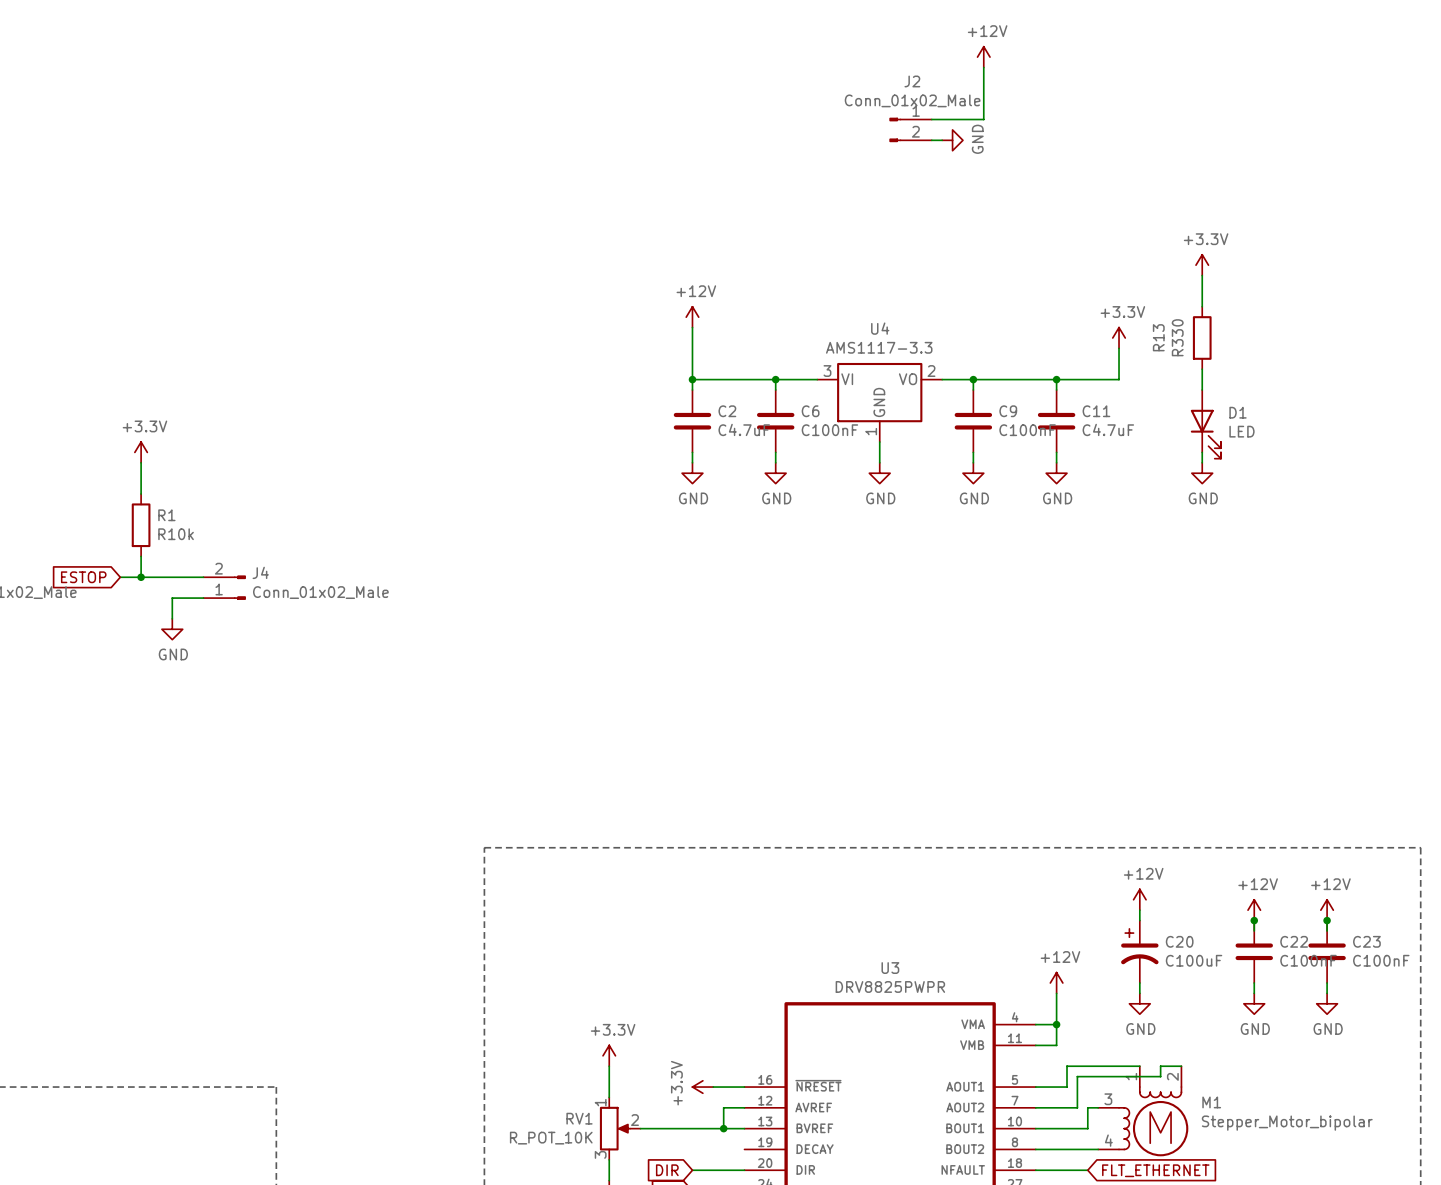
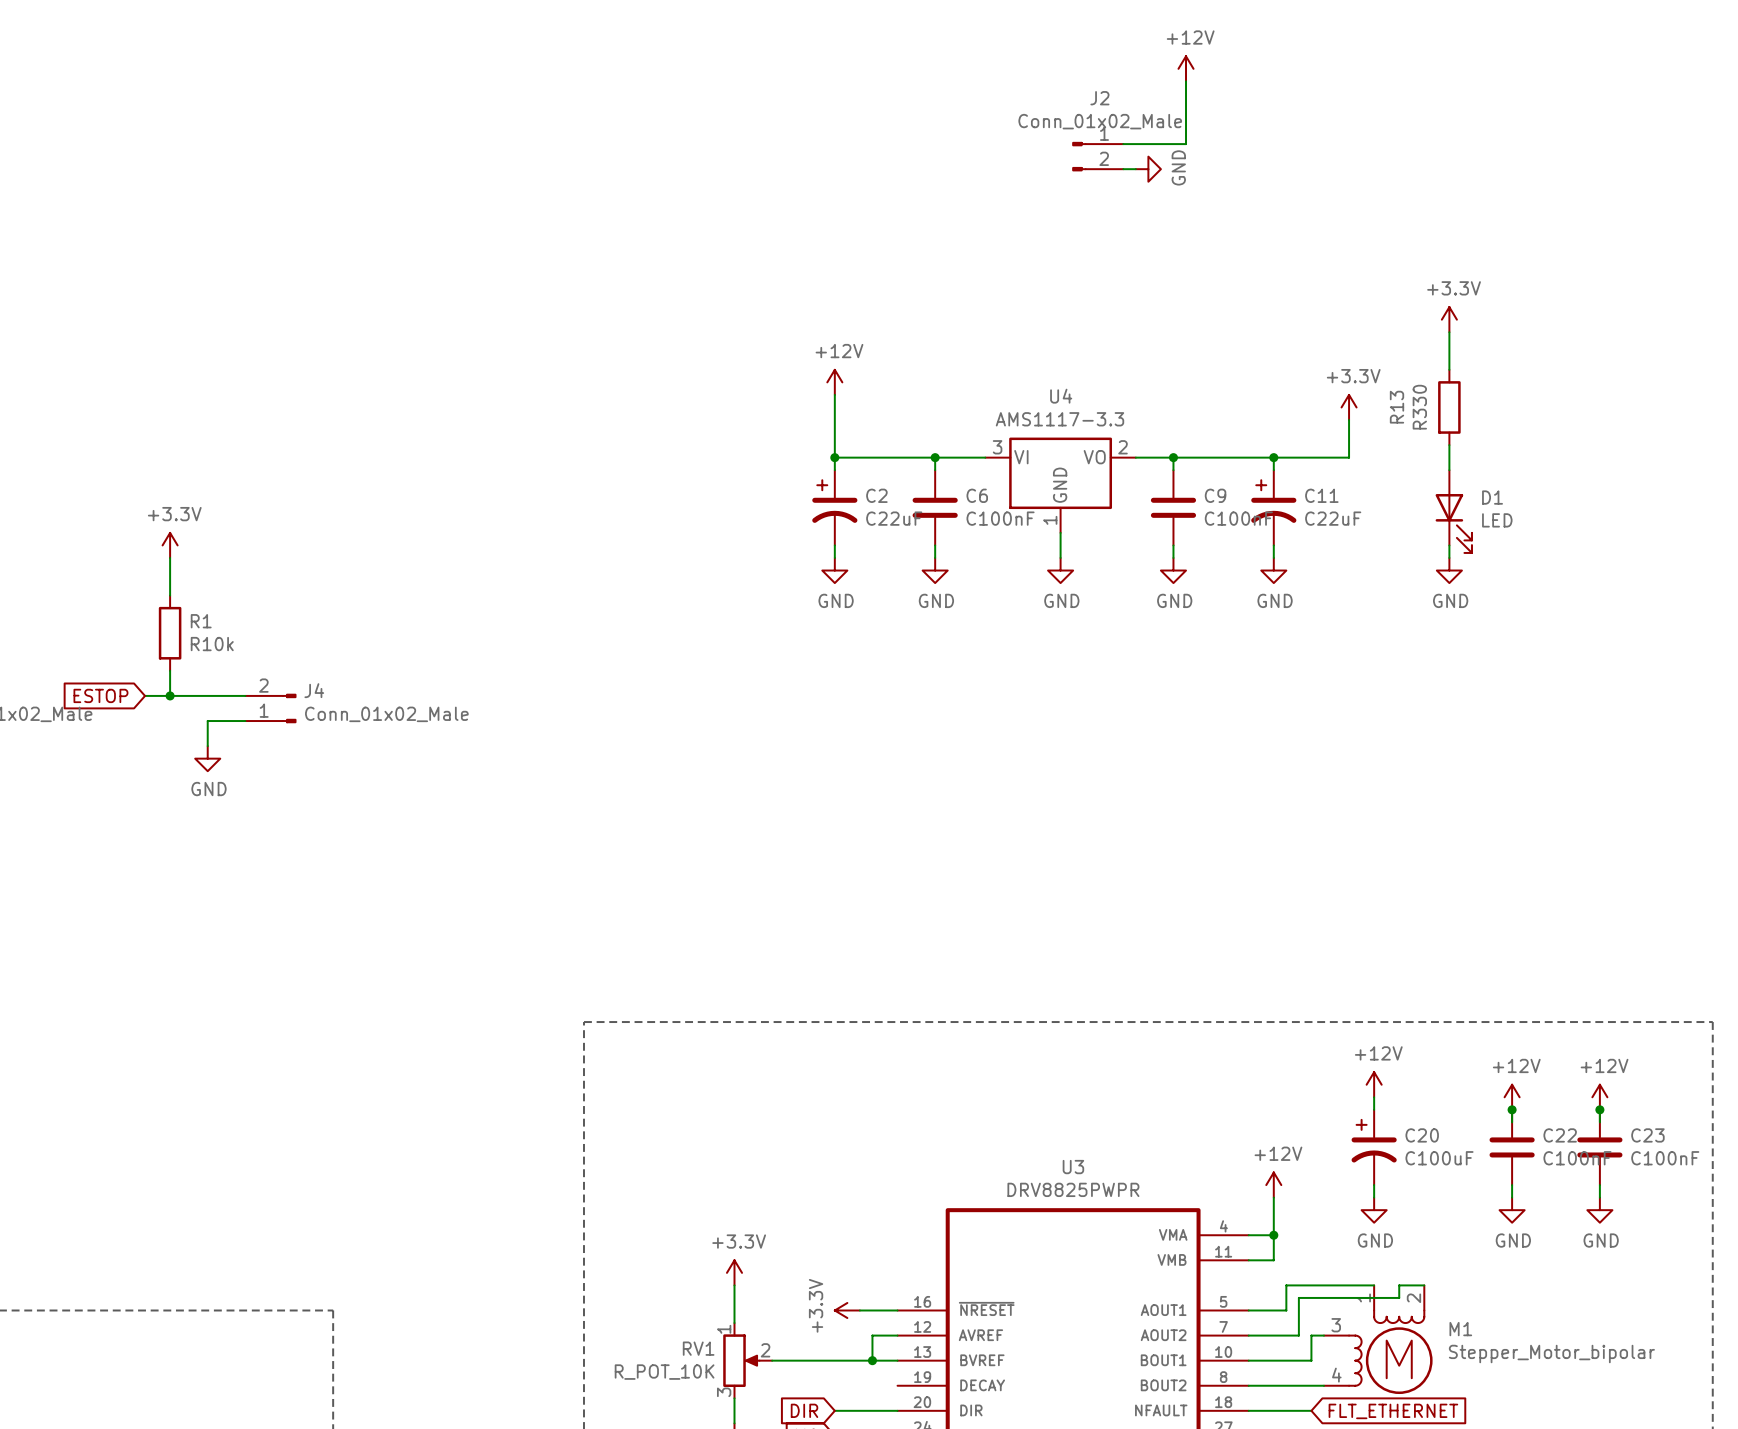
C2 symbol: [673, 390, 712, 453] -> [812, 470, 858, 546]
C11 symbol: [1037, 390, 1076, 453] -> [1251, 470, 1297, 546]
C2 value: C4.7uF (744, 429) -> C22uF (894, 518)
C11 value: C4.7uF (1108, 429) -> C22uF (1333, 518)

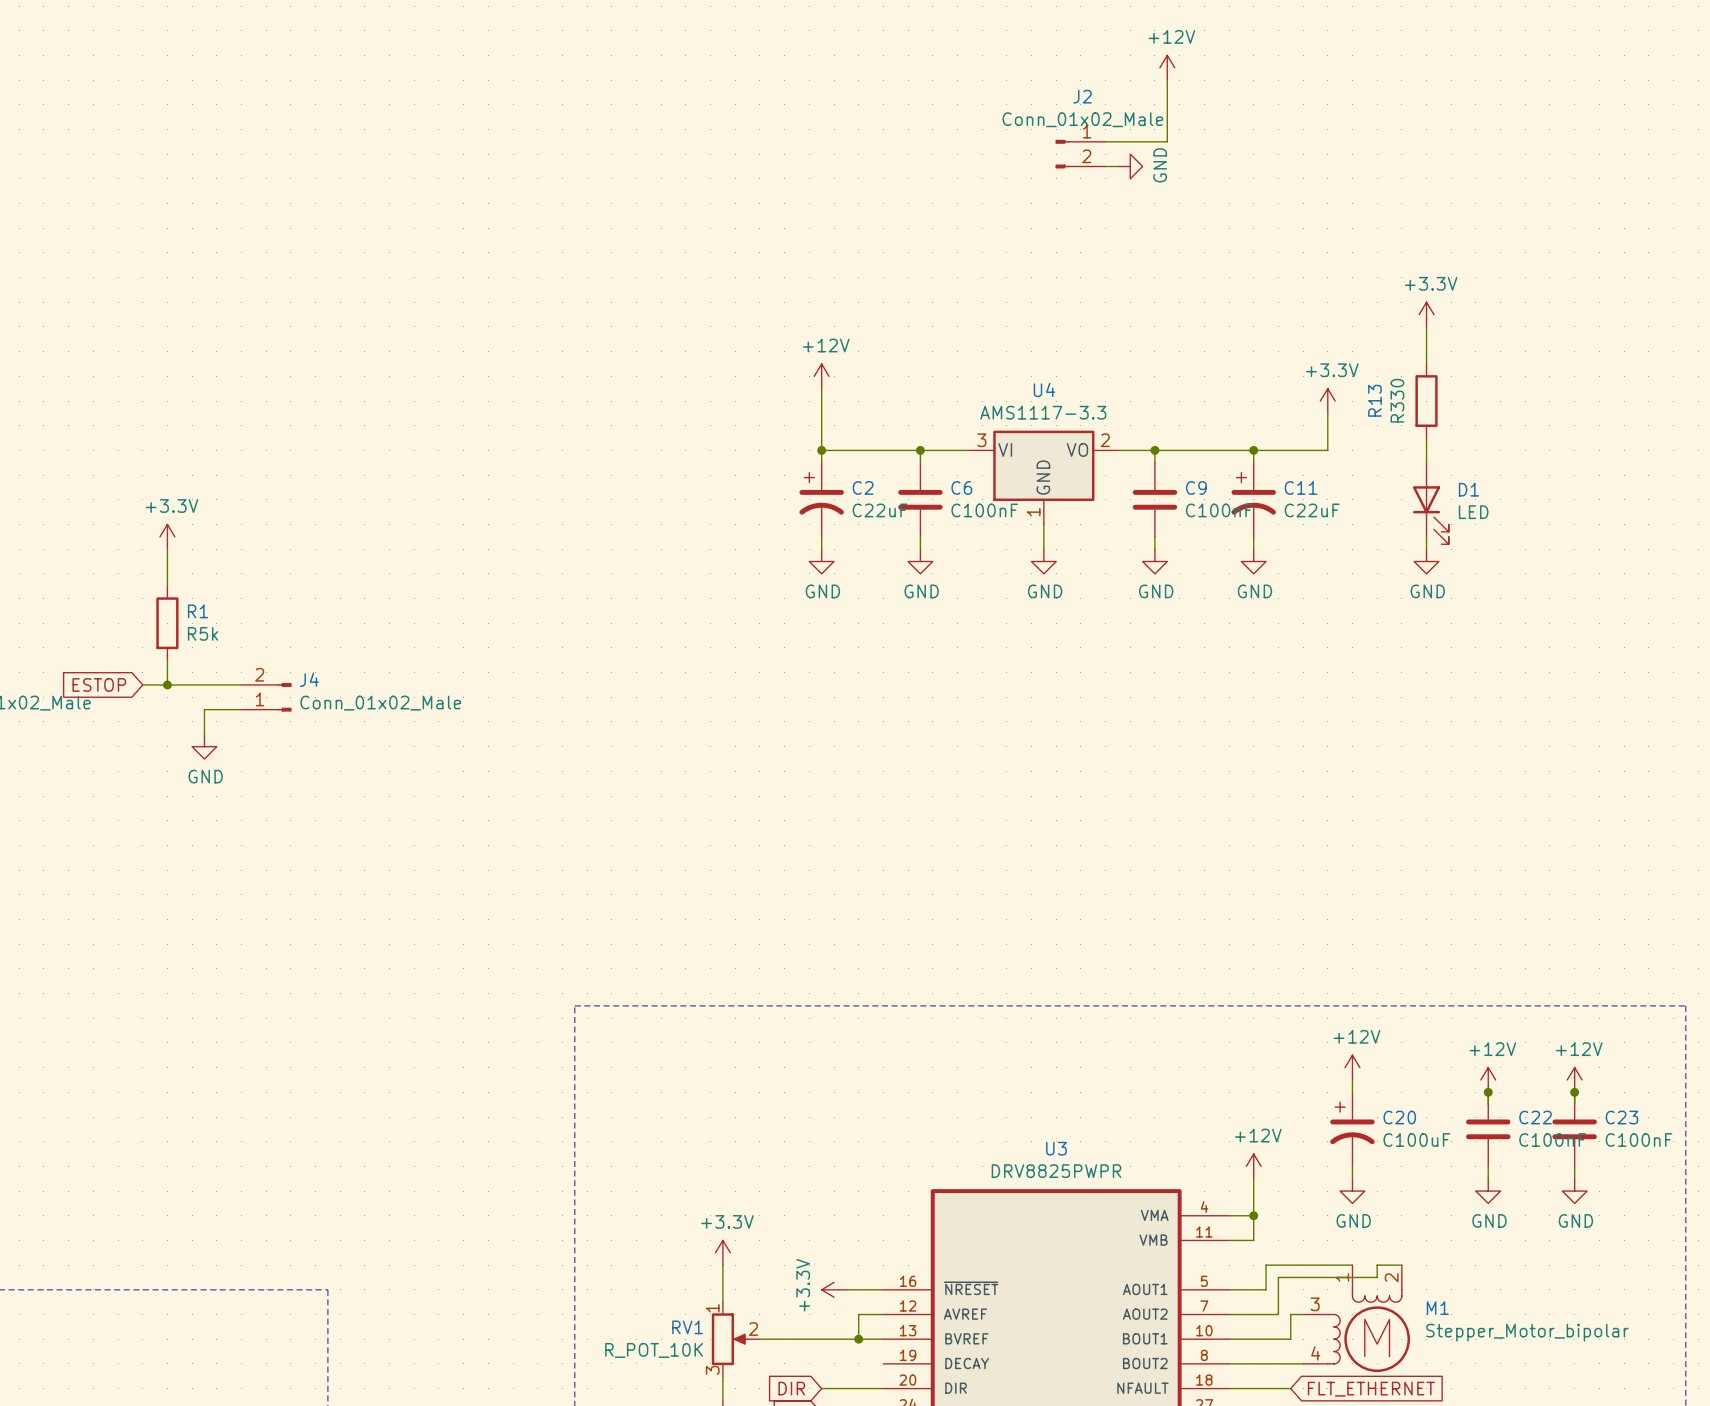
R1 value: R10k (212, 644) -> R5k (203, 633)

